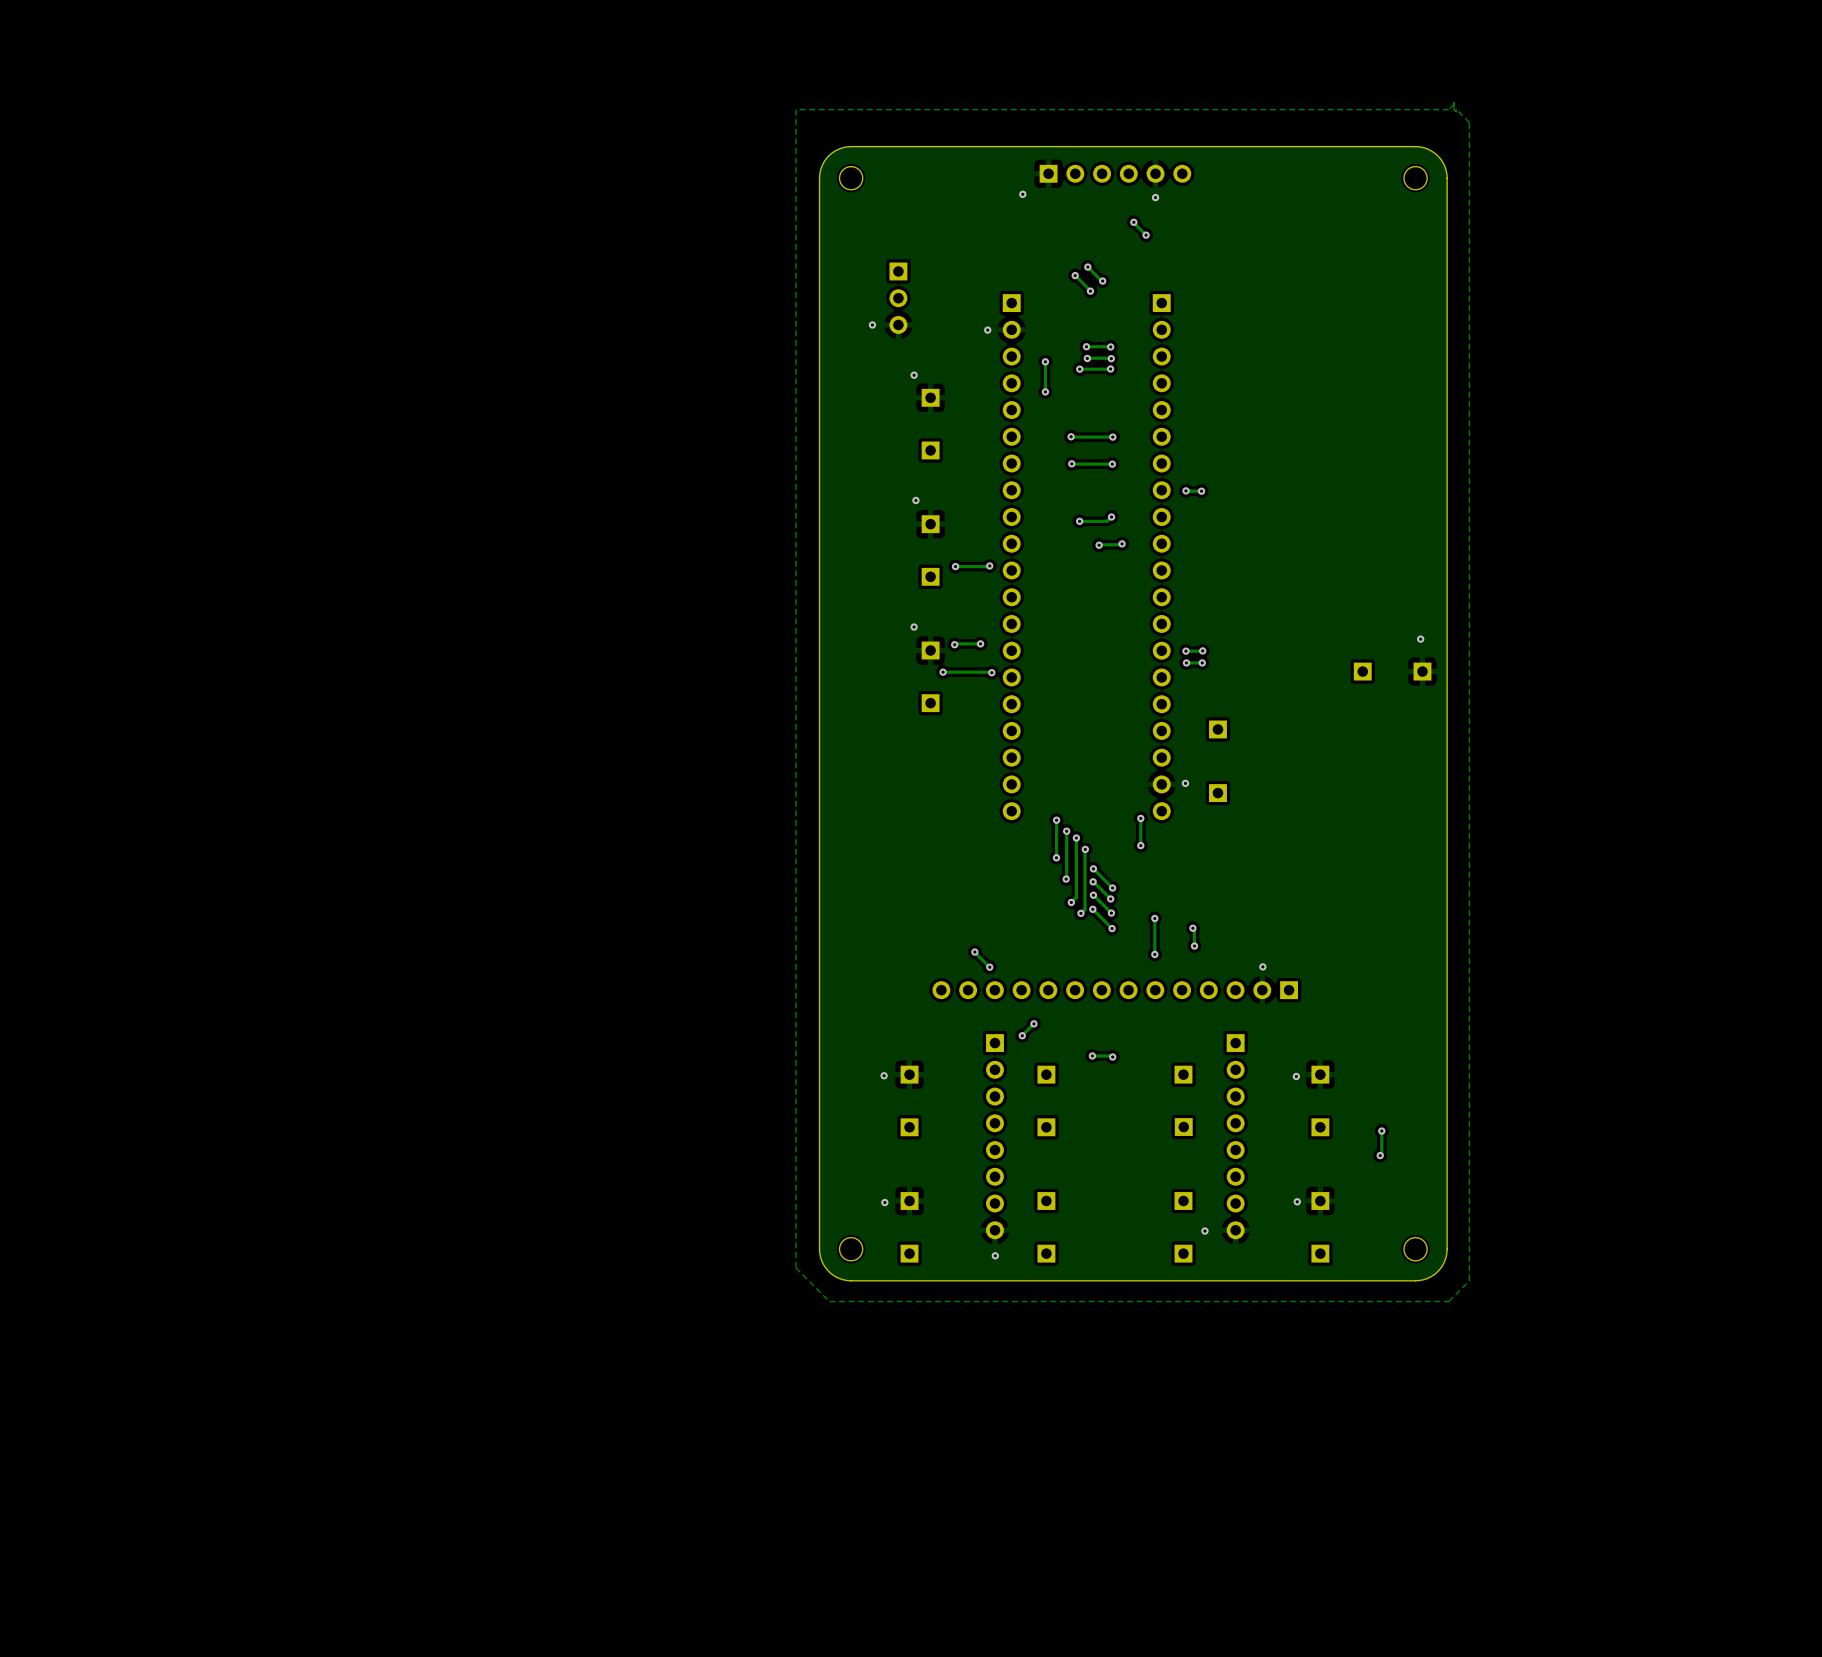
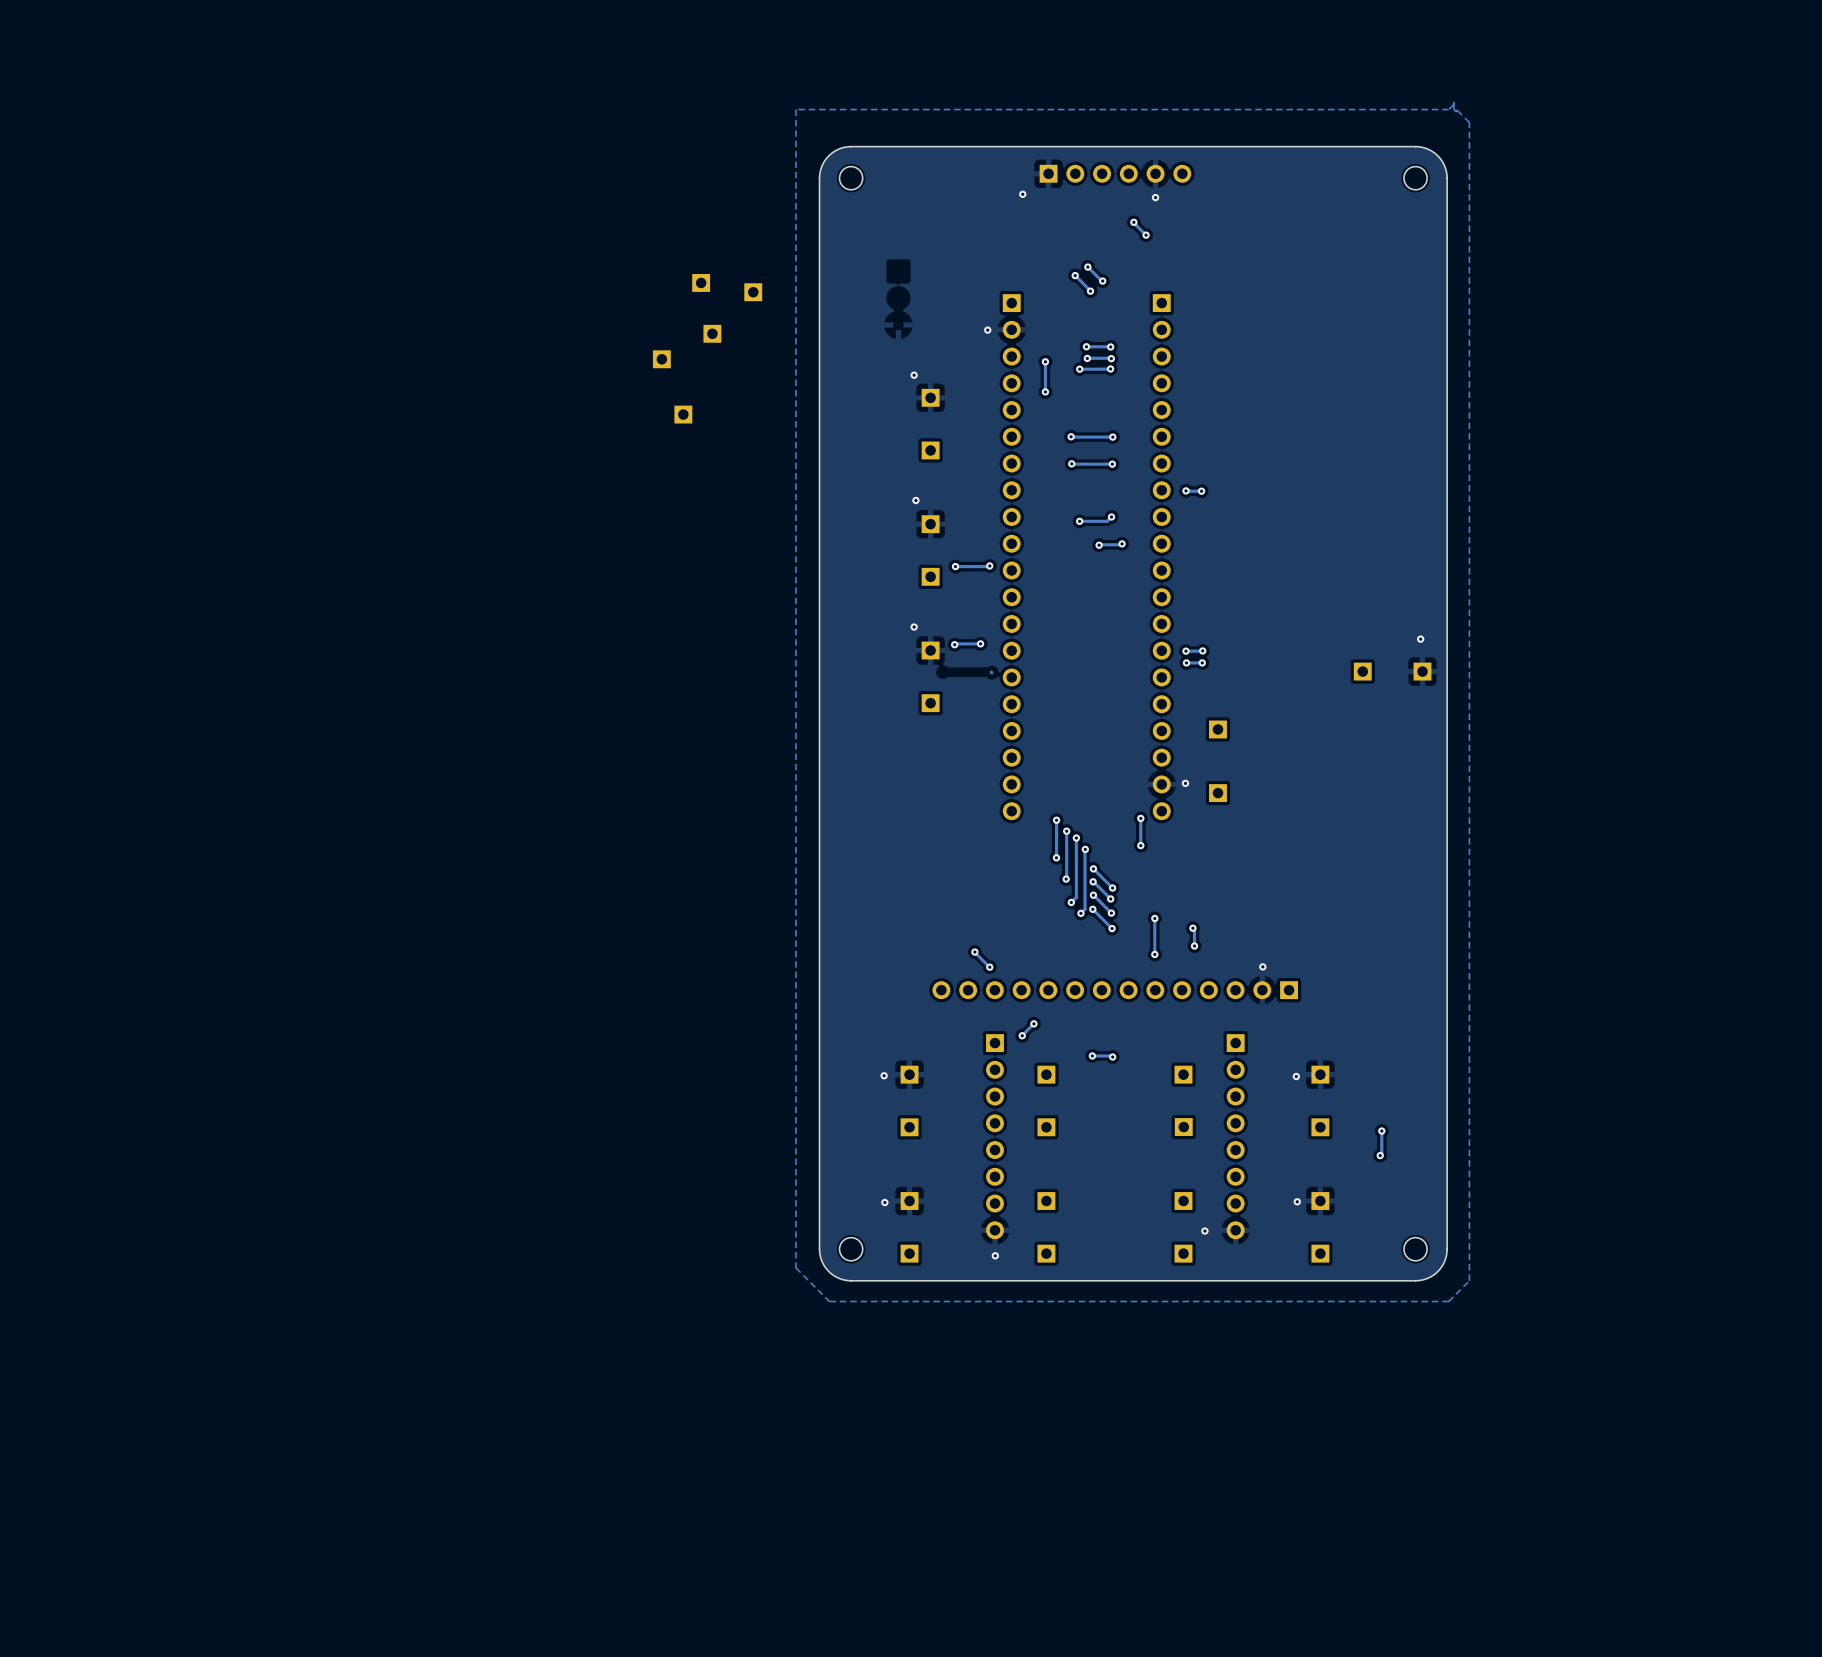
part: none -> (701, 282)
part: none -> (753, 292)
part: (898, 298) -> none
via: (872, 324) -> none
part: none -> (712, 333)
part: none -> (661, 359)
part: none -> (683, 414)
via: (943, 672) -> none
track: (991, 672) (943, 672) -> none
via: (991, 672) -> none

